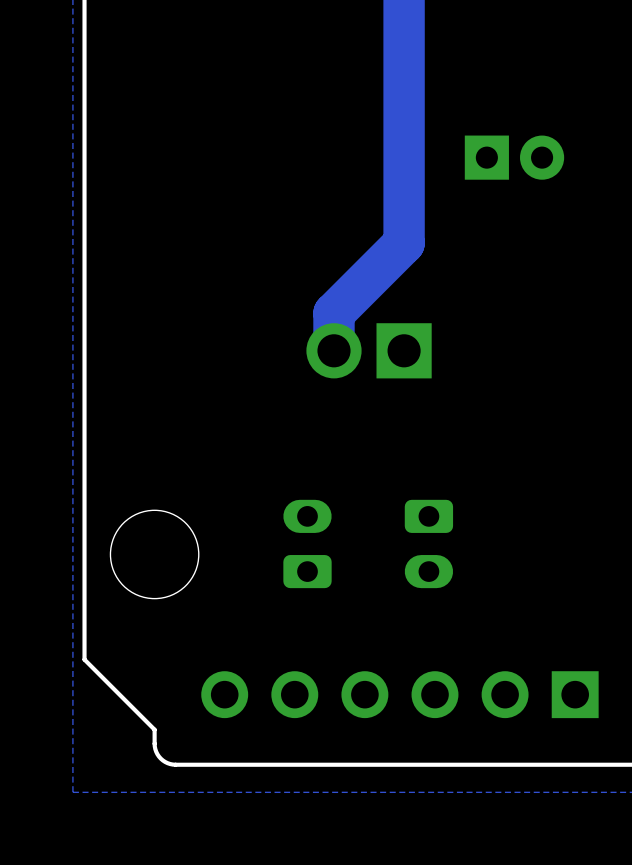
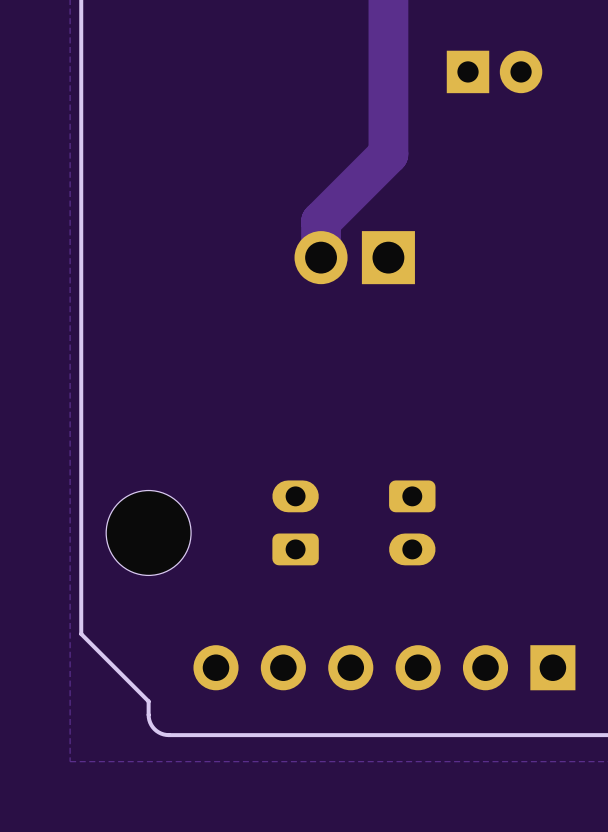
part position: (514, 157) -> (494, 71)
track: (404, 160) (404, 243) (333, 313) (333, 350) -> (388, 154) (321, 221) (321, 257)
part position: (369, 350) -> (354, 257)

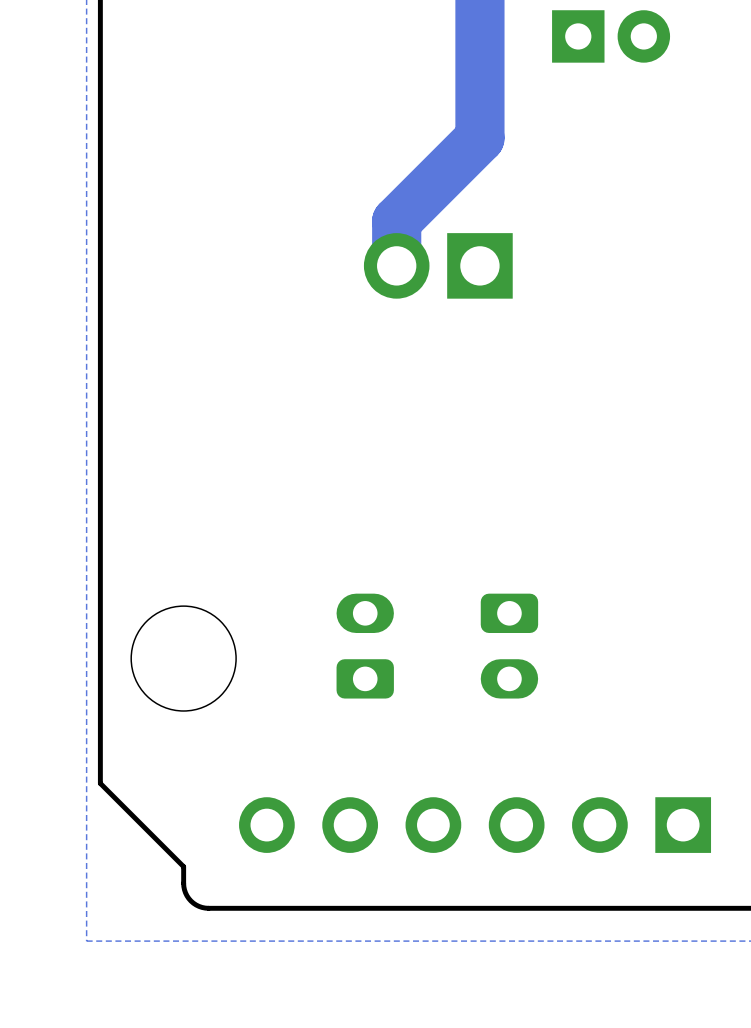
part position: (494, 71) -> (611, 36)
track: (388, 111) (388, 154) (321, 221) (321, 257) -> (479, 138) (396, 221) (396, 265)
part position: (354, 257) -> (438, 265)

